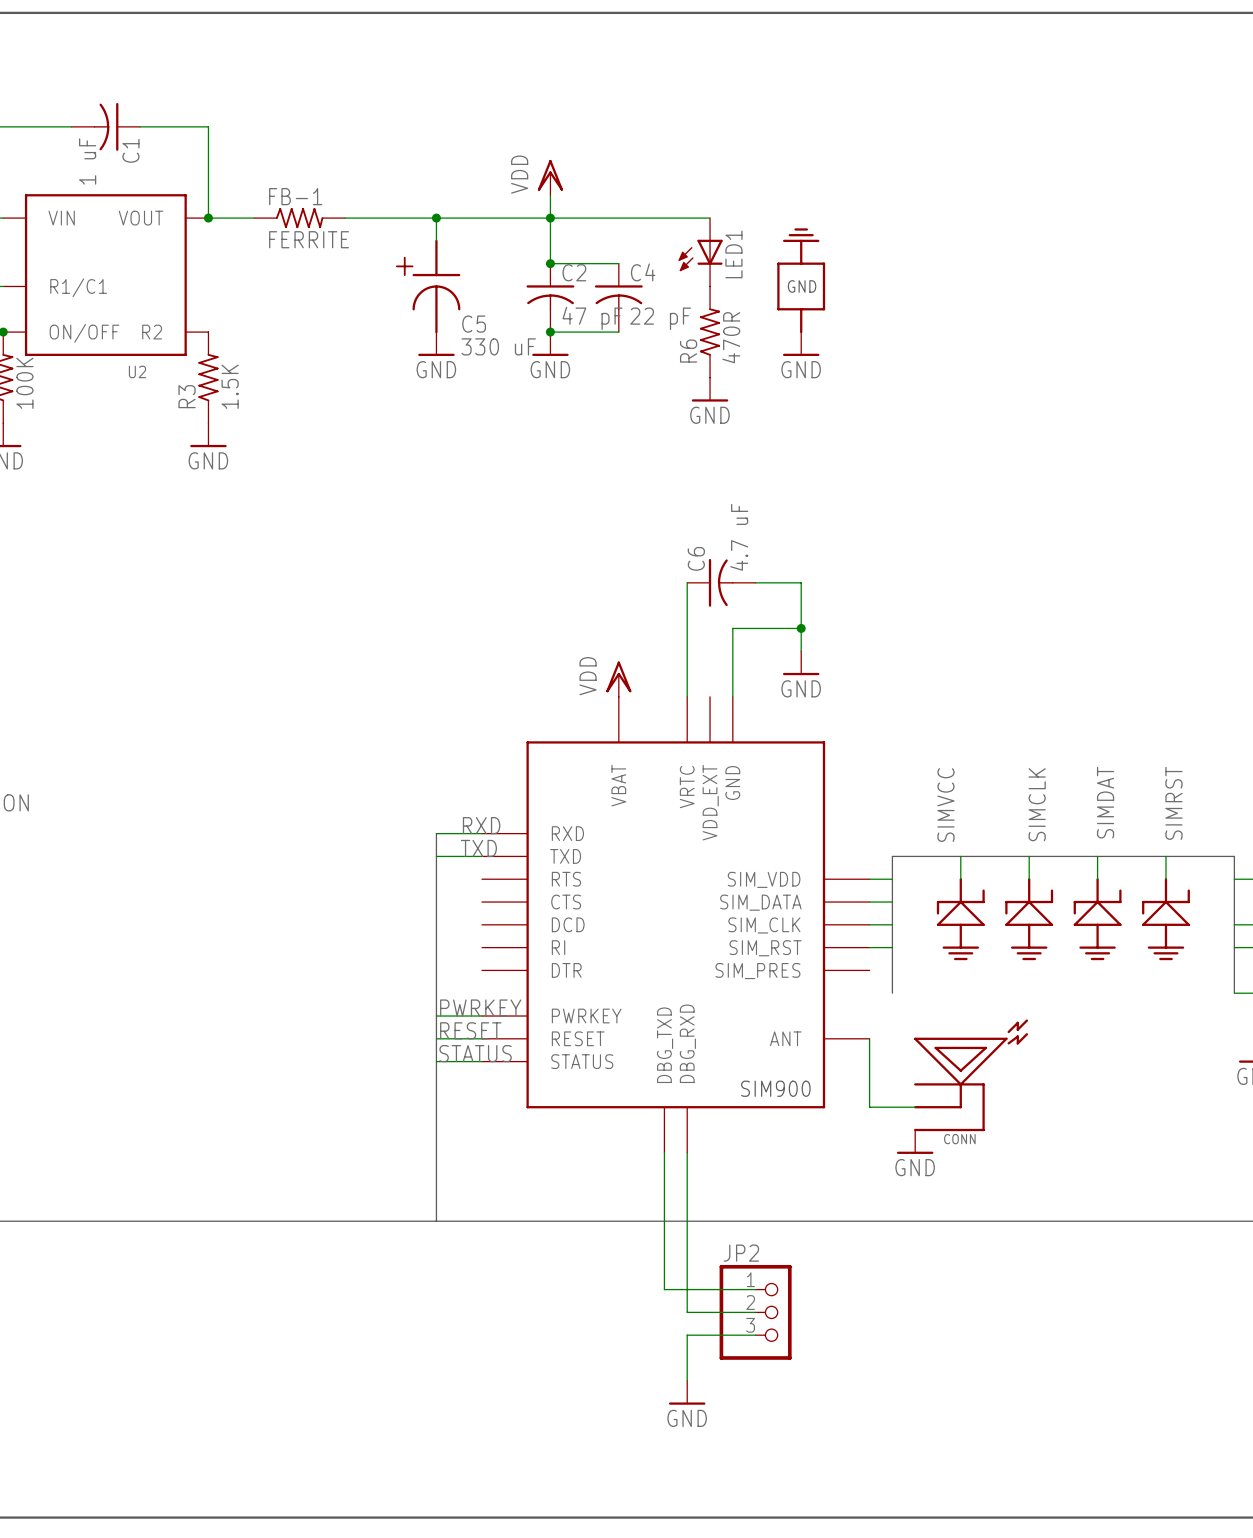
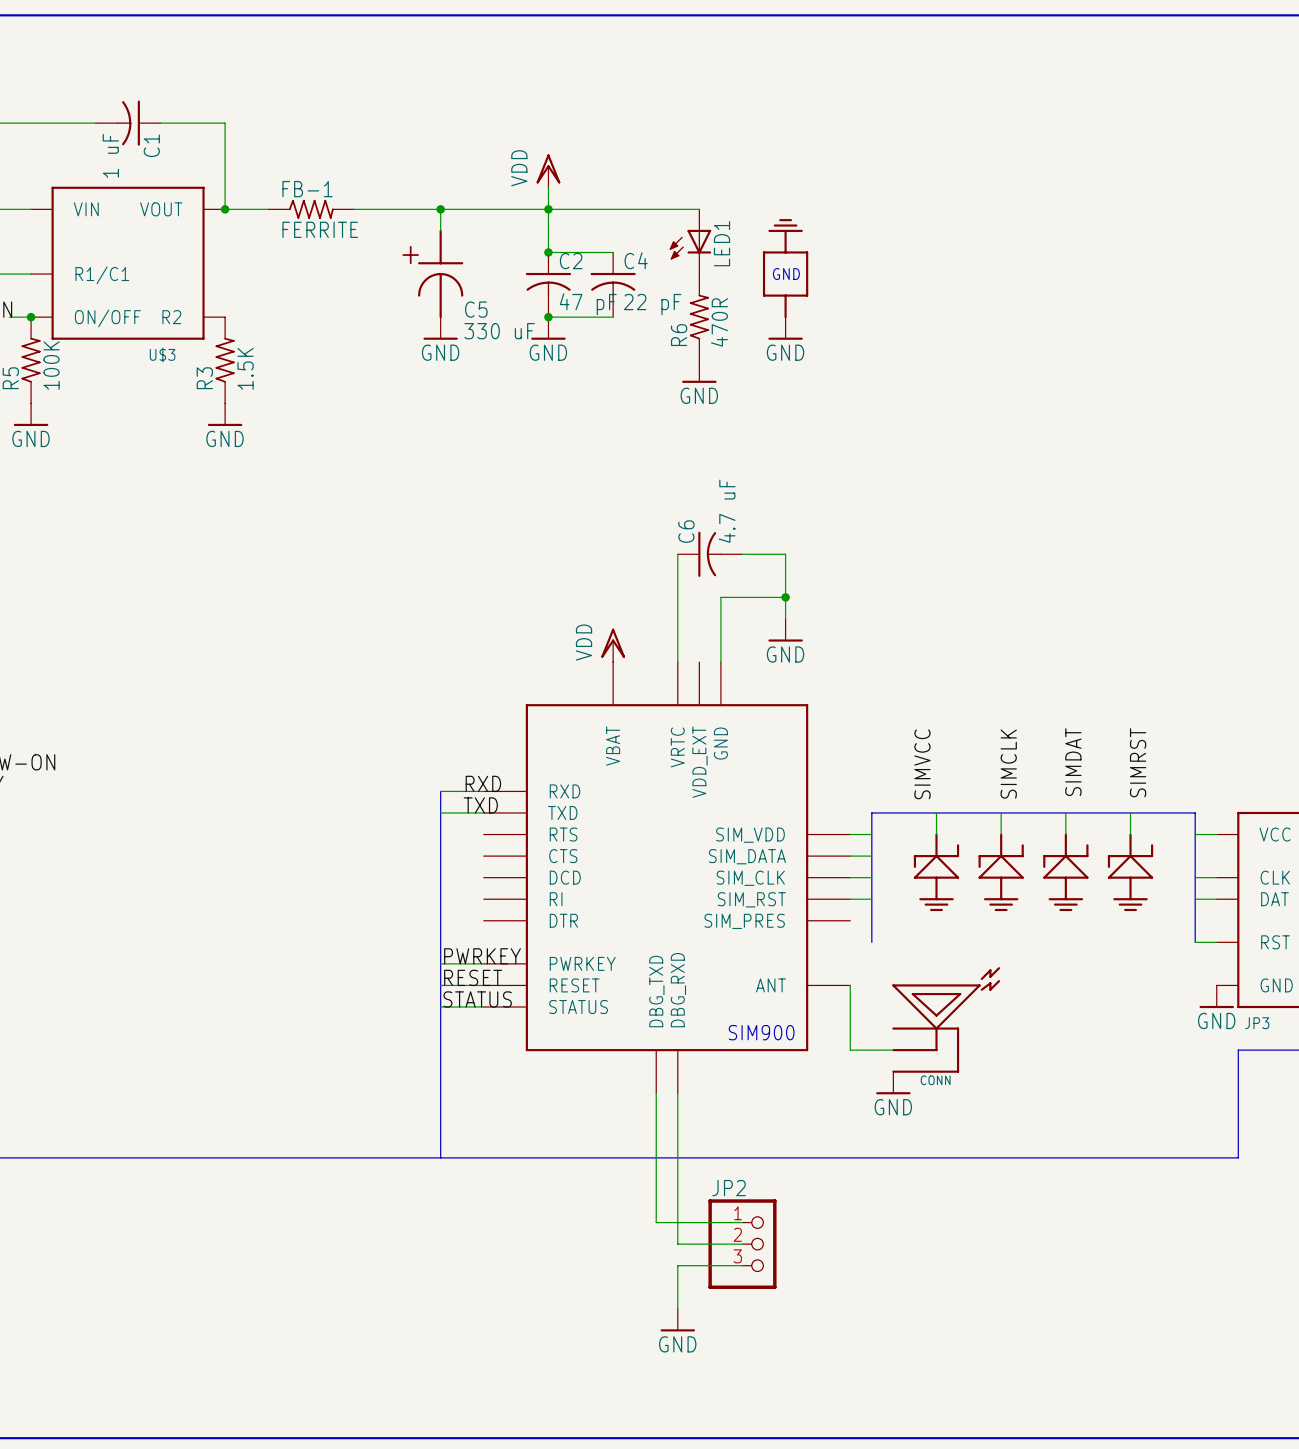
U2 name: U2 (137, 371) -> U$3 (162, 354)

